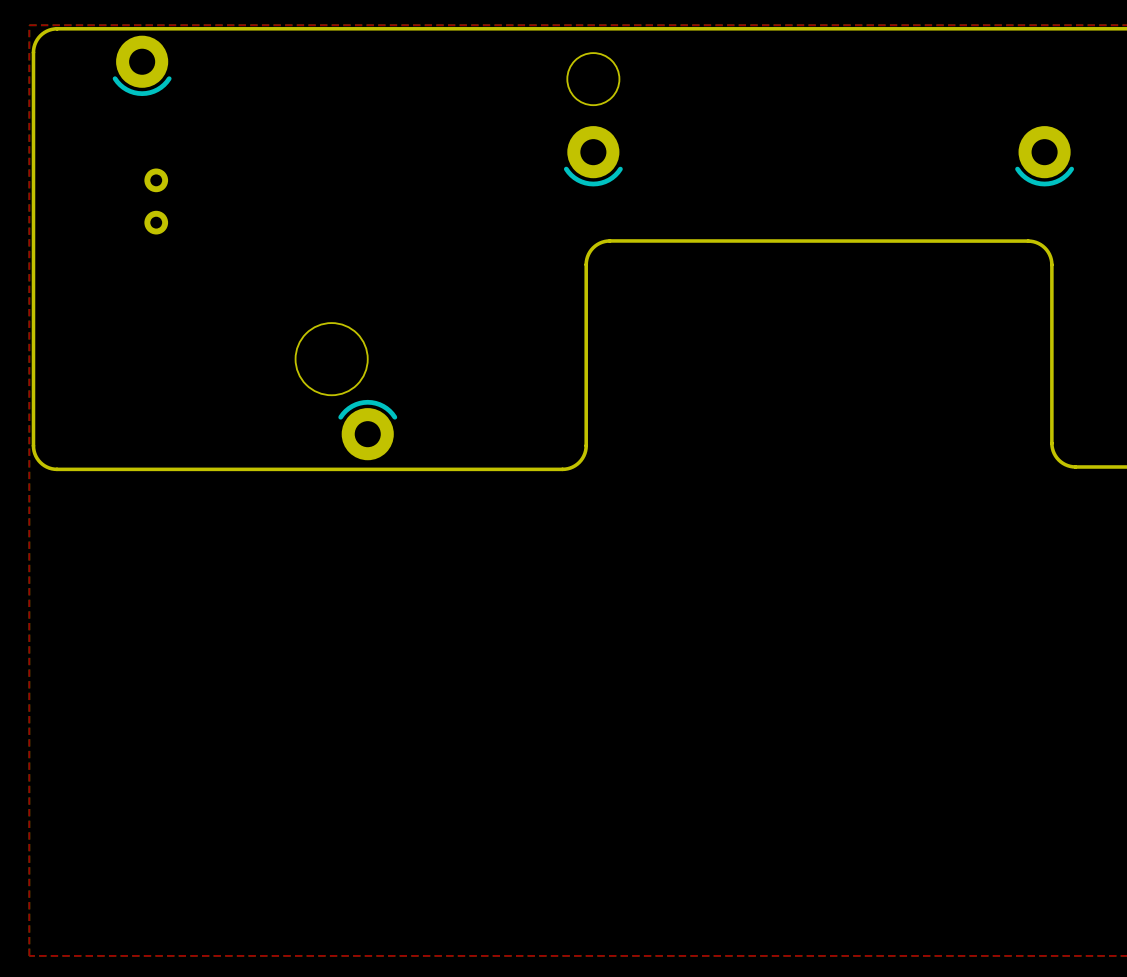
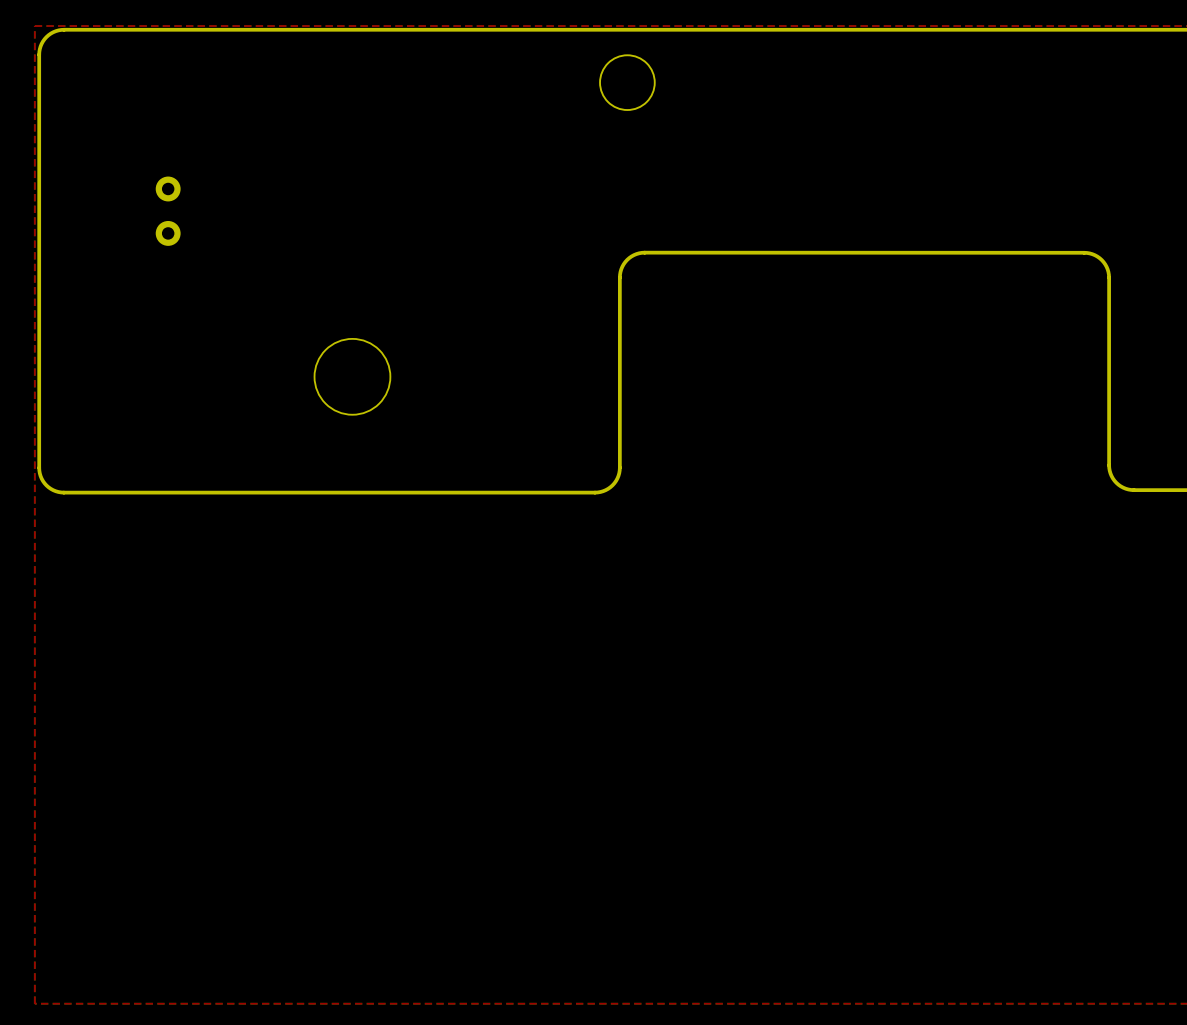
part: (142, 65) -> none
part: (593, 156) -> none
part: (1044, 156) -> none
part: (367, 430) -> none

